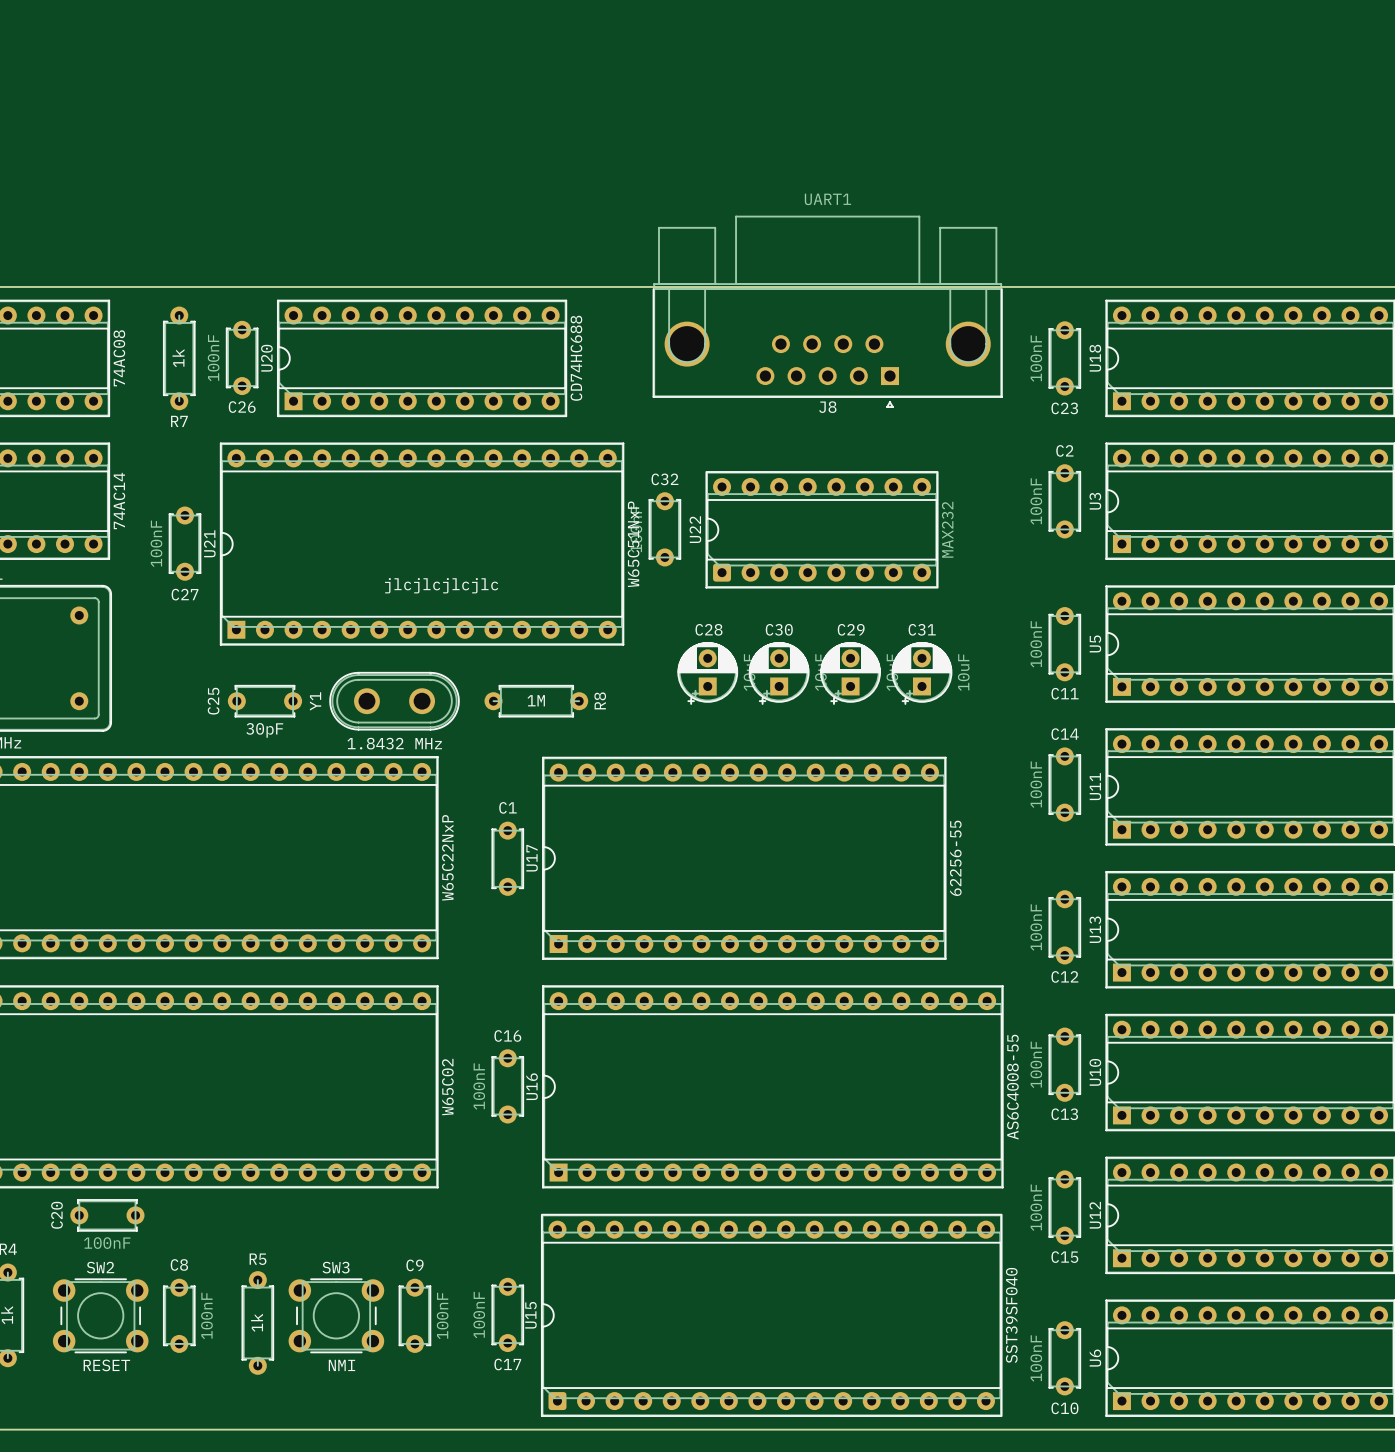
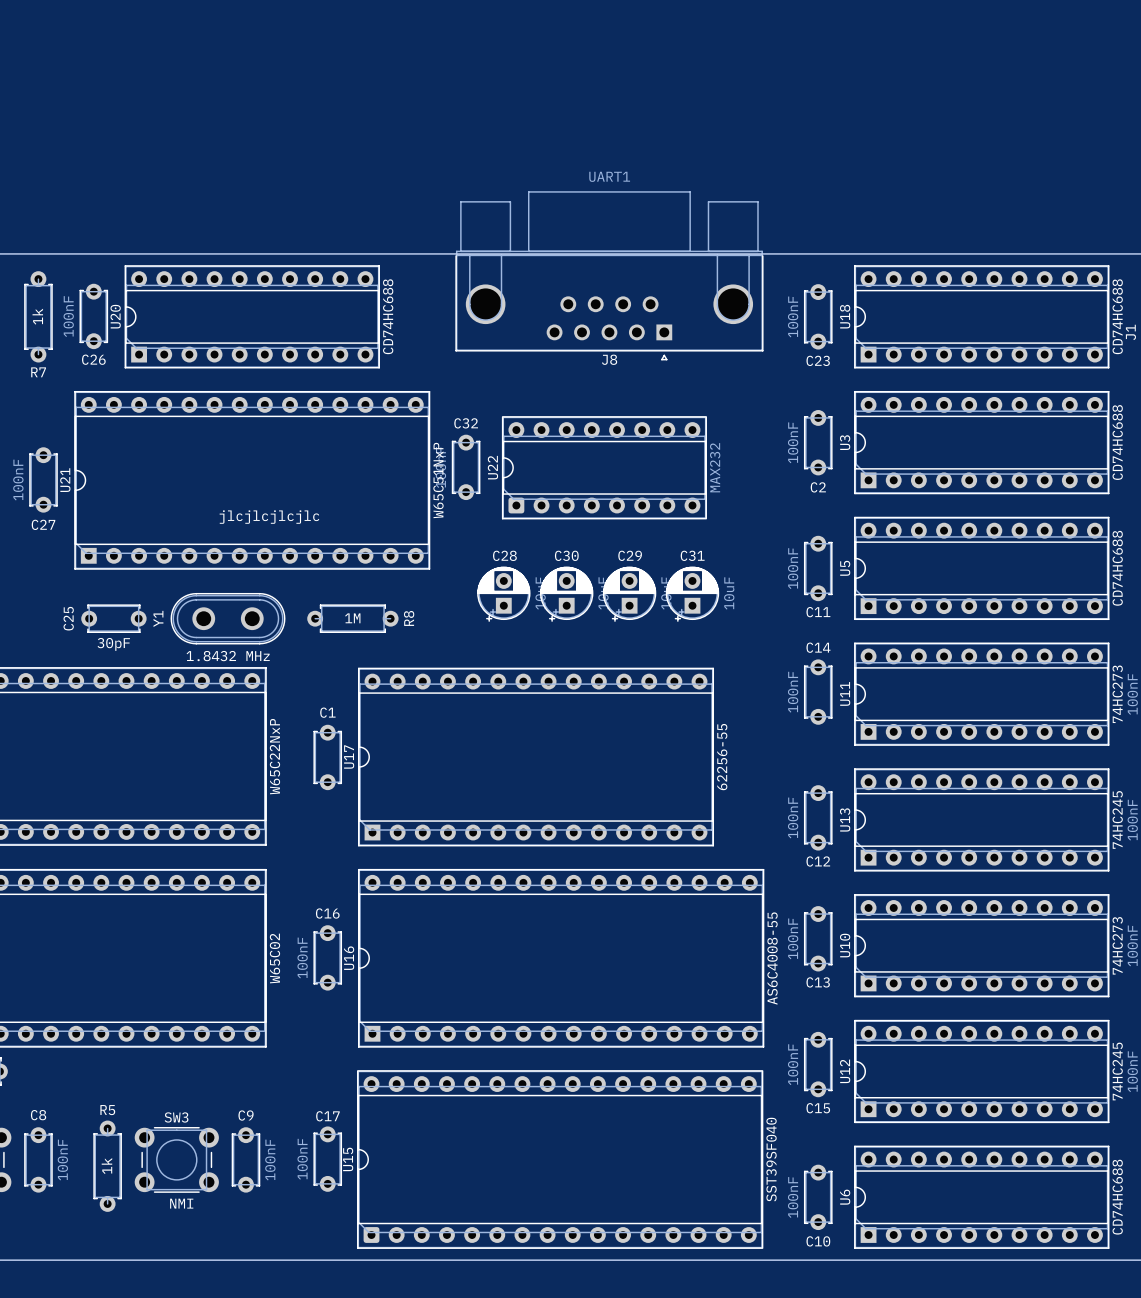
C2 name position: C2 (1064, 450) -> C2 (818, 487)
C17 name position: C17 (507, 1364) -> C17 (327, 1116)

